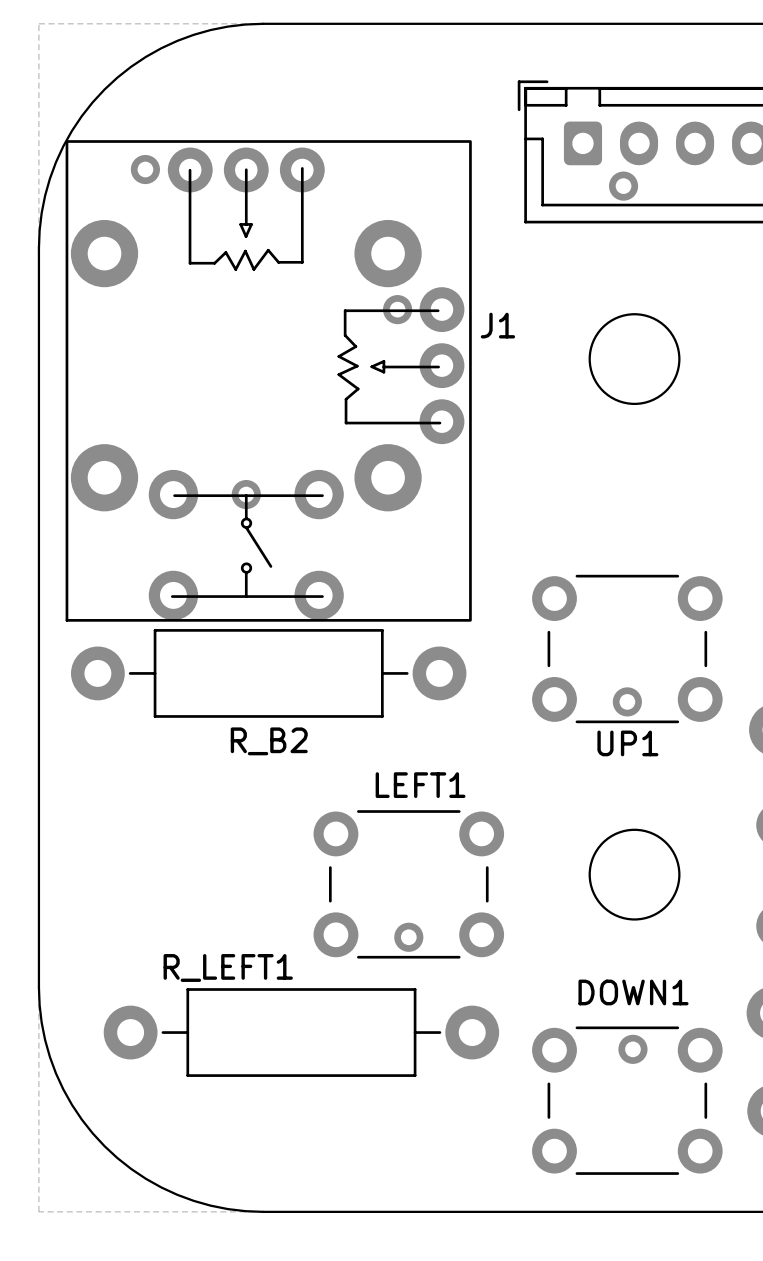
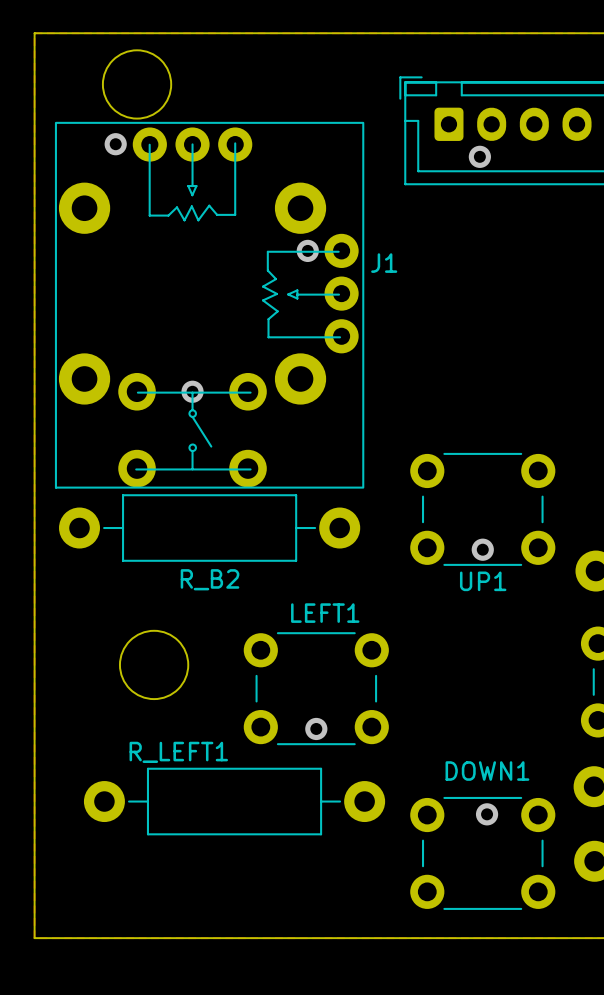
board edge: (263, 23) (228, 26) (177, 40) (145, 56) (104, 89) (71, 130) (56, 162) (41, 212) (38, 247) -> (205, 33) (34, 33) (34, 203)
round board edge: none -> [102, 49, 173, 120]
round board edge: [588, 313, 681, 406] -> none
round board edge: none -> [119, 629, 190, 700]
round board edge: [588, 828, 681, 921] -> none
board edge: (38, 987) (45, 1040) (56, 1073) (71, 1104) (104, 1146) (145, 1178) (177, 1194) (210, 1205) (263, 1211) -> (34, 767) (34, 938) (205, 938)

